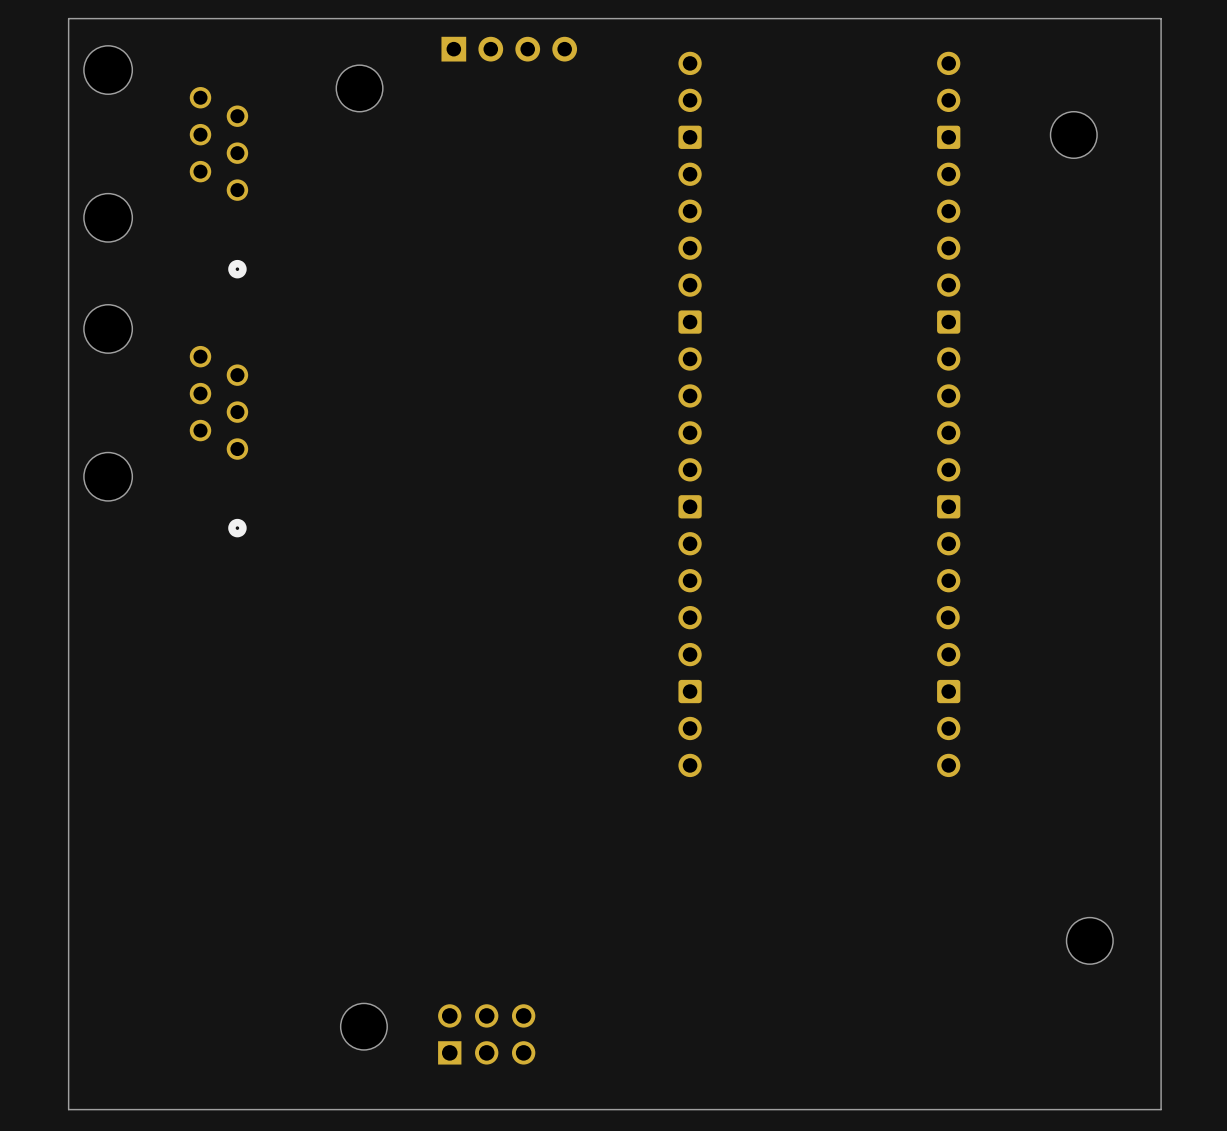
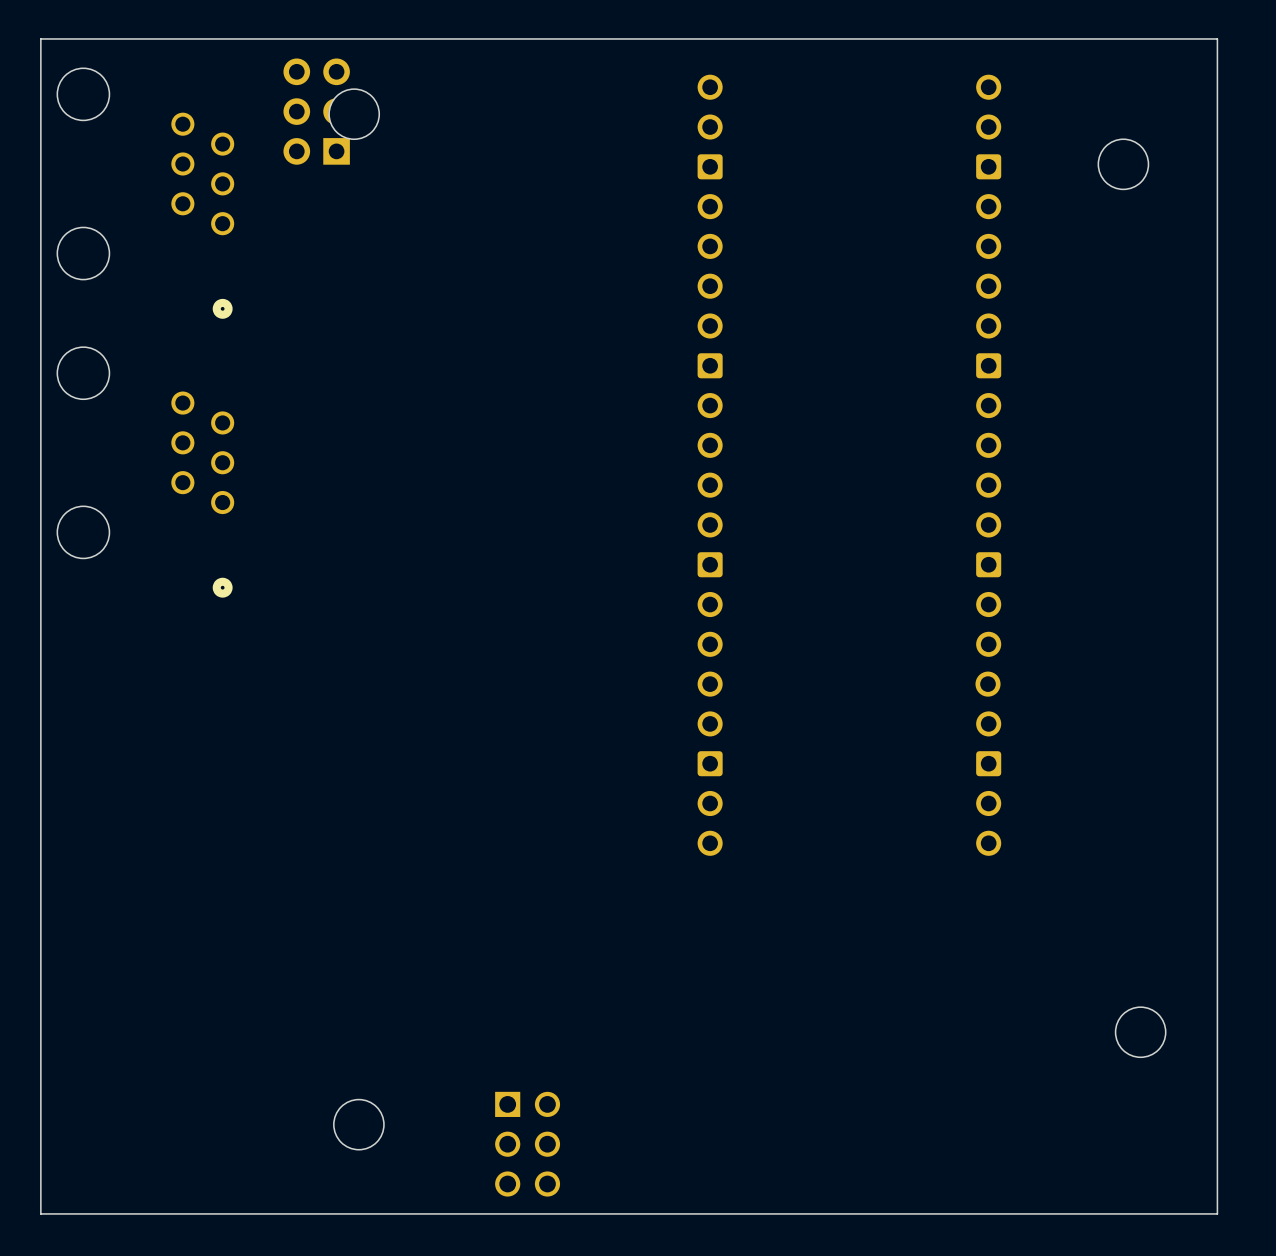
part: (509, 49) -> none
part: none -> (316, 111)
part rotation: 0° (486, 1034) -> 90° clockwise (527, 1144)

